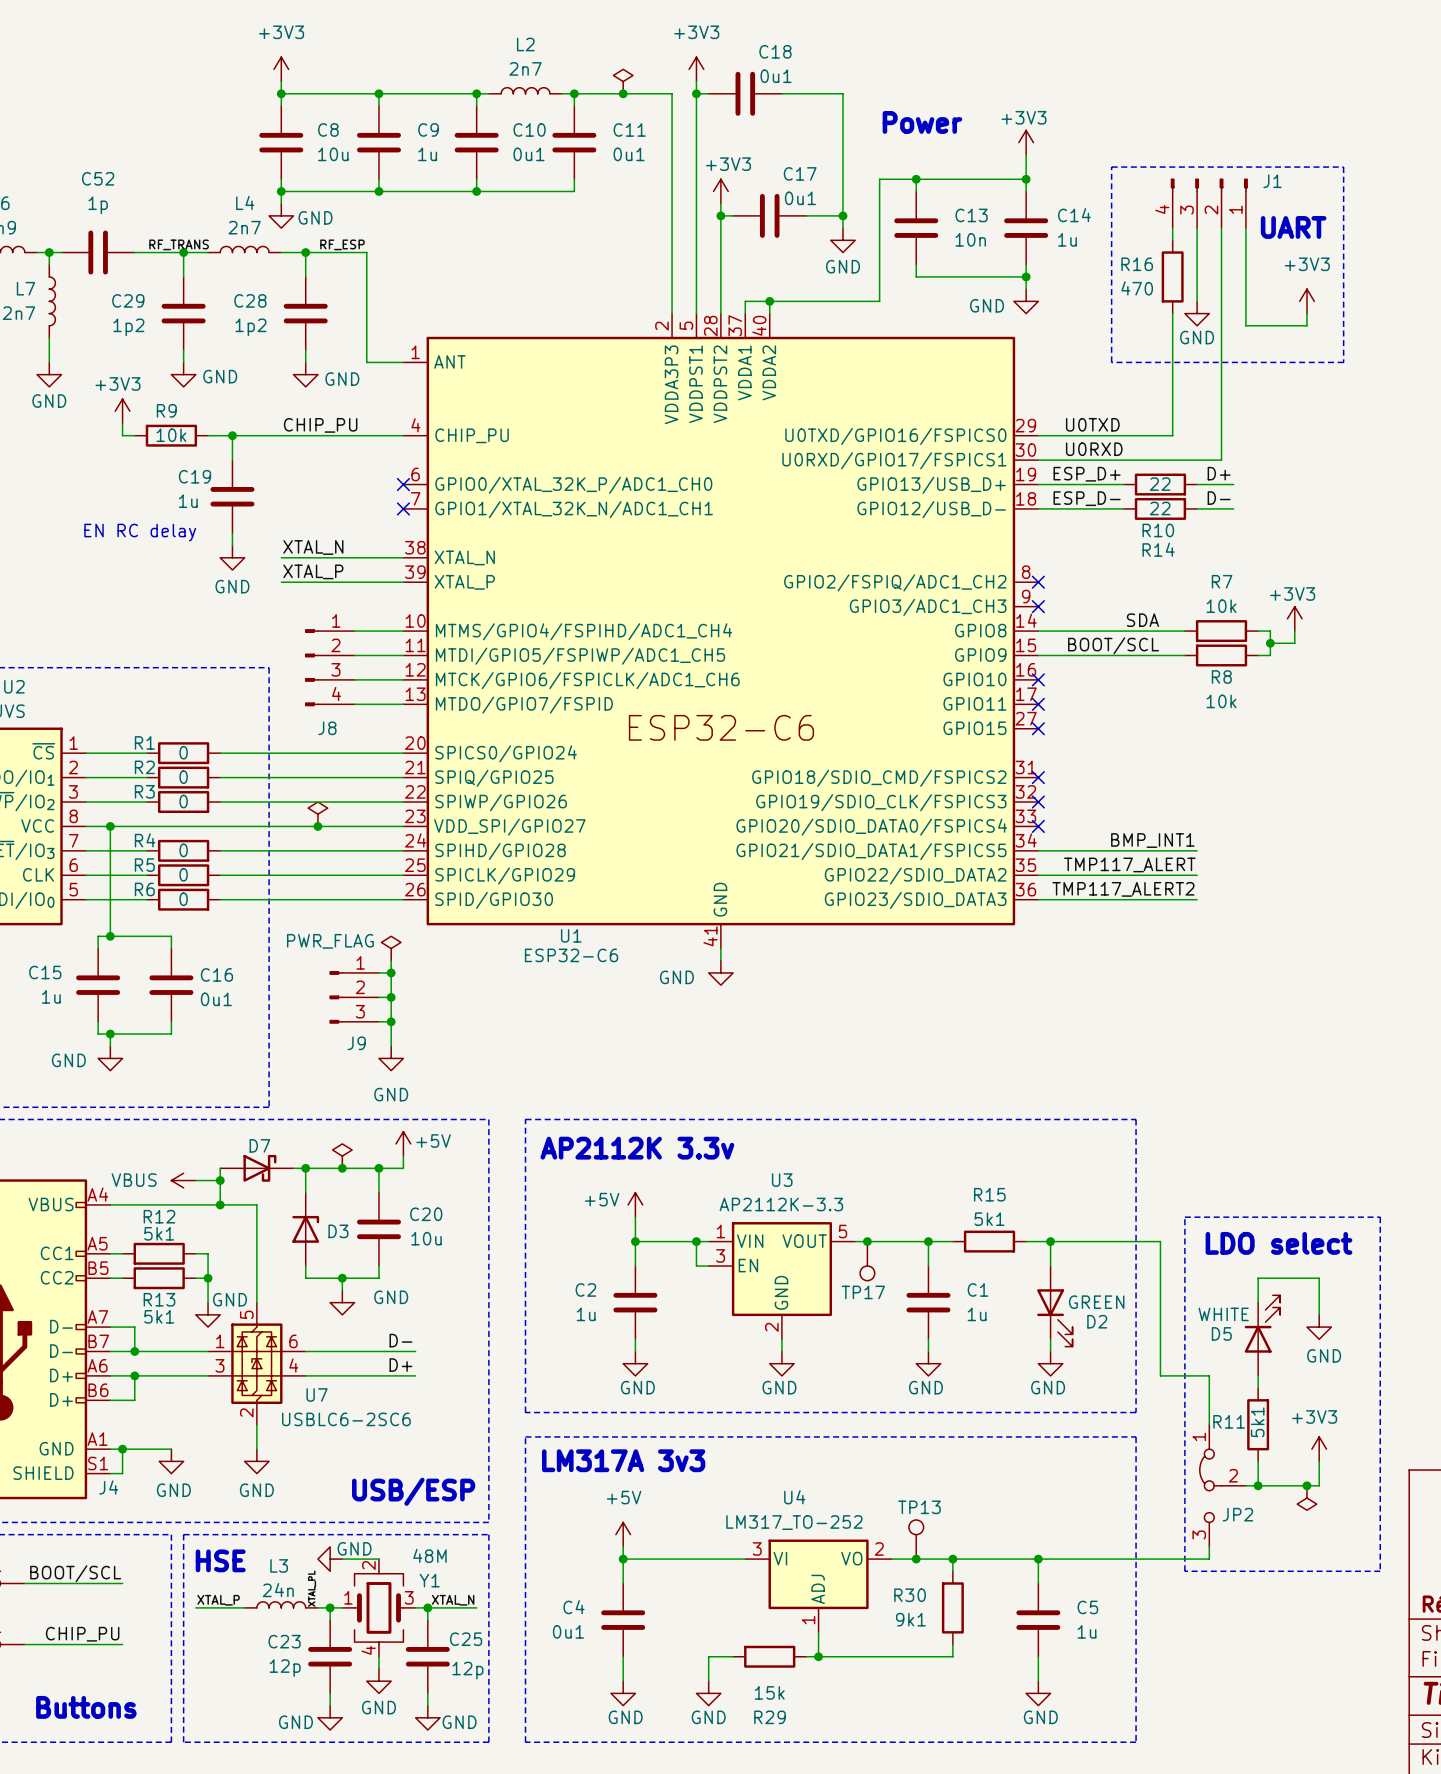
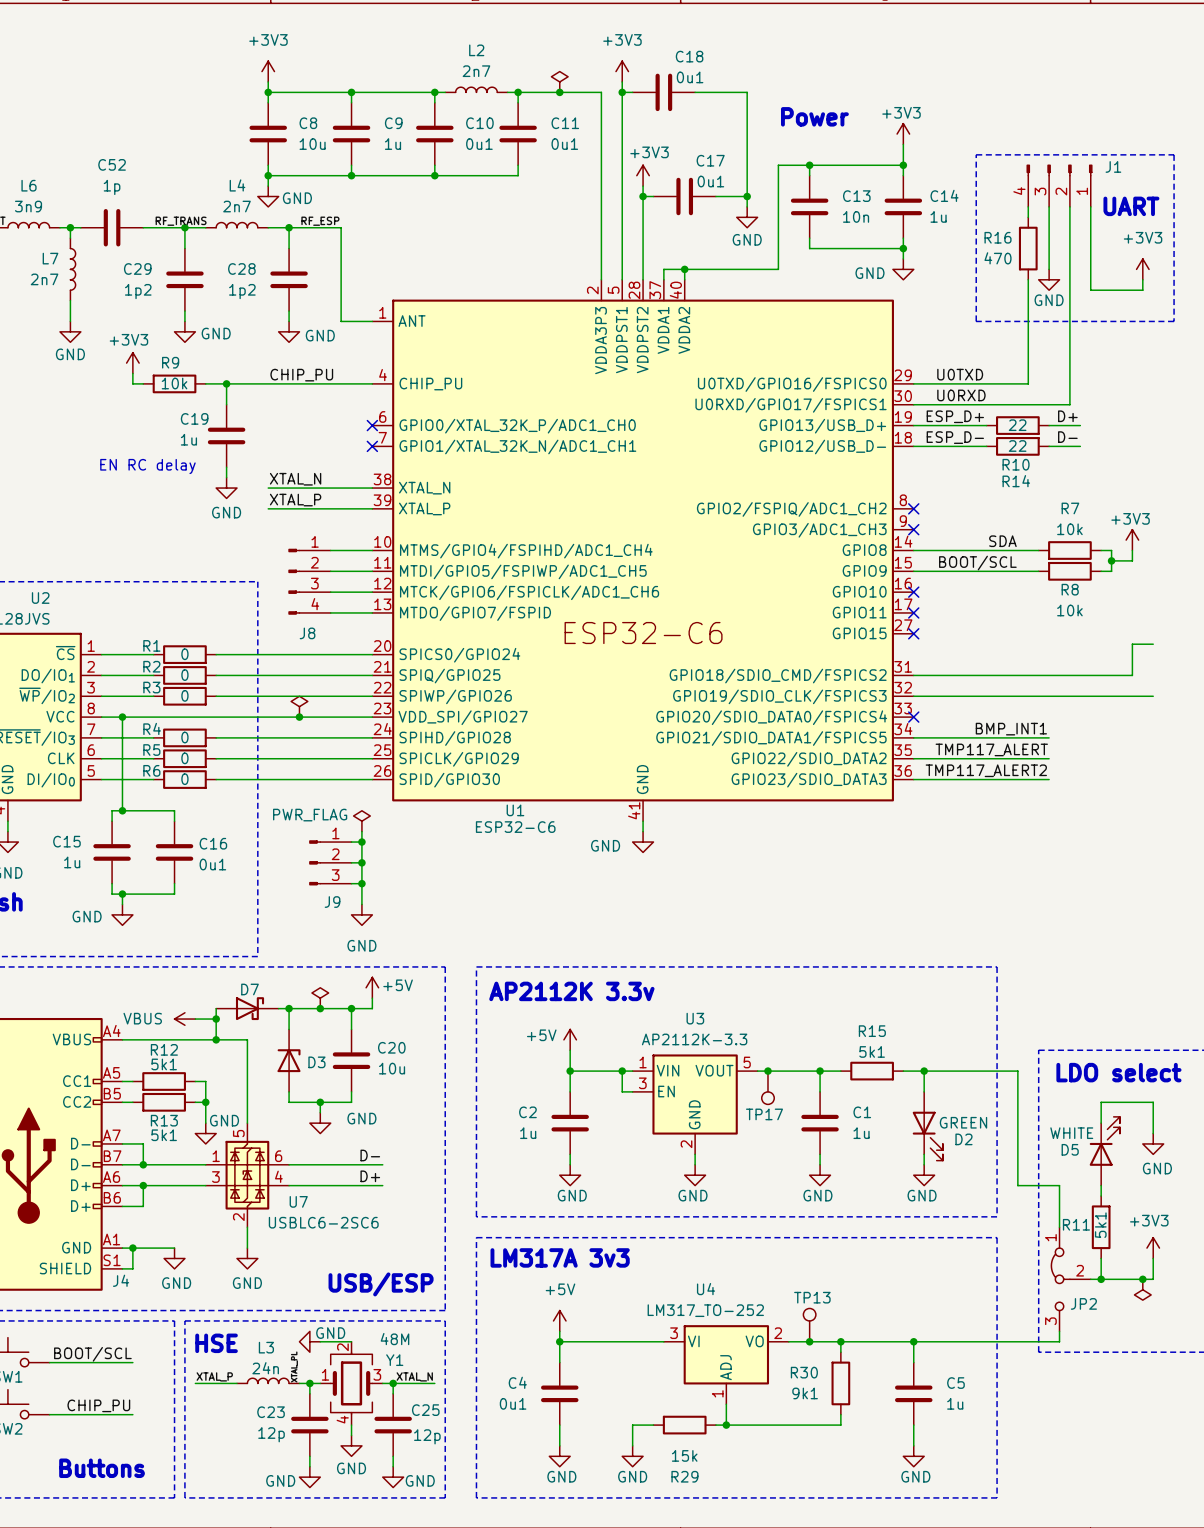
wire: none -> (1153, 644) (1132, 644) (1132, 675) (913, 675)
no-connect mark: (1038, 777) -> none
wire: none -> (913, 696) (1153, 696)
no-connect mark: (1038, 802) -> none

